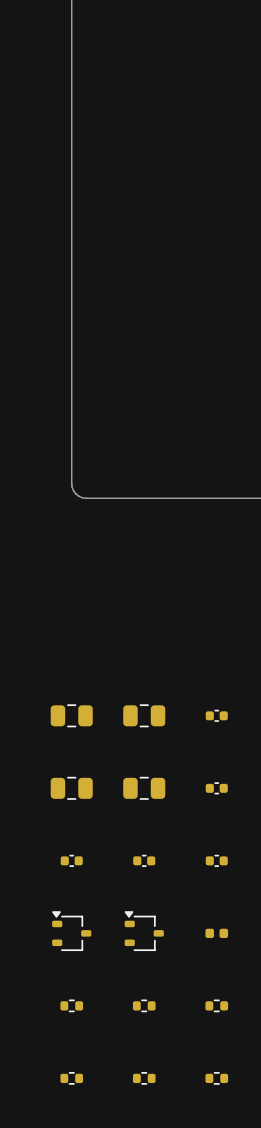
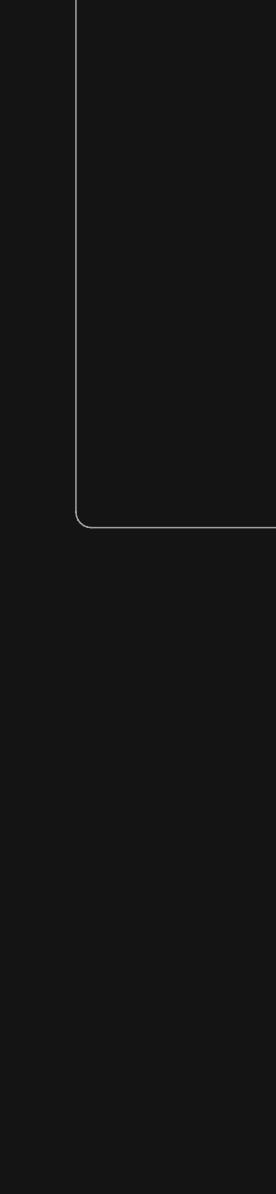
part: (71, 715) -> none
part: (144, 715) -> none
part: (216, 715) -> none
part: (71, 788) -> none
part: (144, 788) -> none
part: (216, 788) -> none
part: (71, 860) -> none
part: (144, 860) -> none
part: (216, 860) -> none
part: (71, 931) -> none
part: (144, 931) -> none
part: (216, 933) -> none
part: (71, 1005) -> none
part: (144, 1005) -> none
part: (216, 1005) -> none
part: (71, 1078) -> none
part: (144, 1078) -> none
part: (216, 1078) -> none

